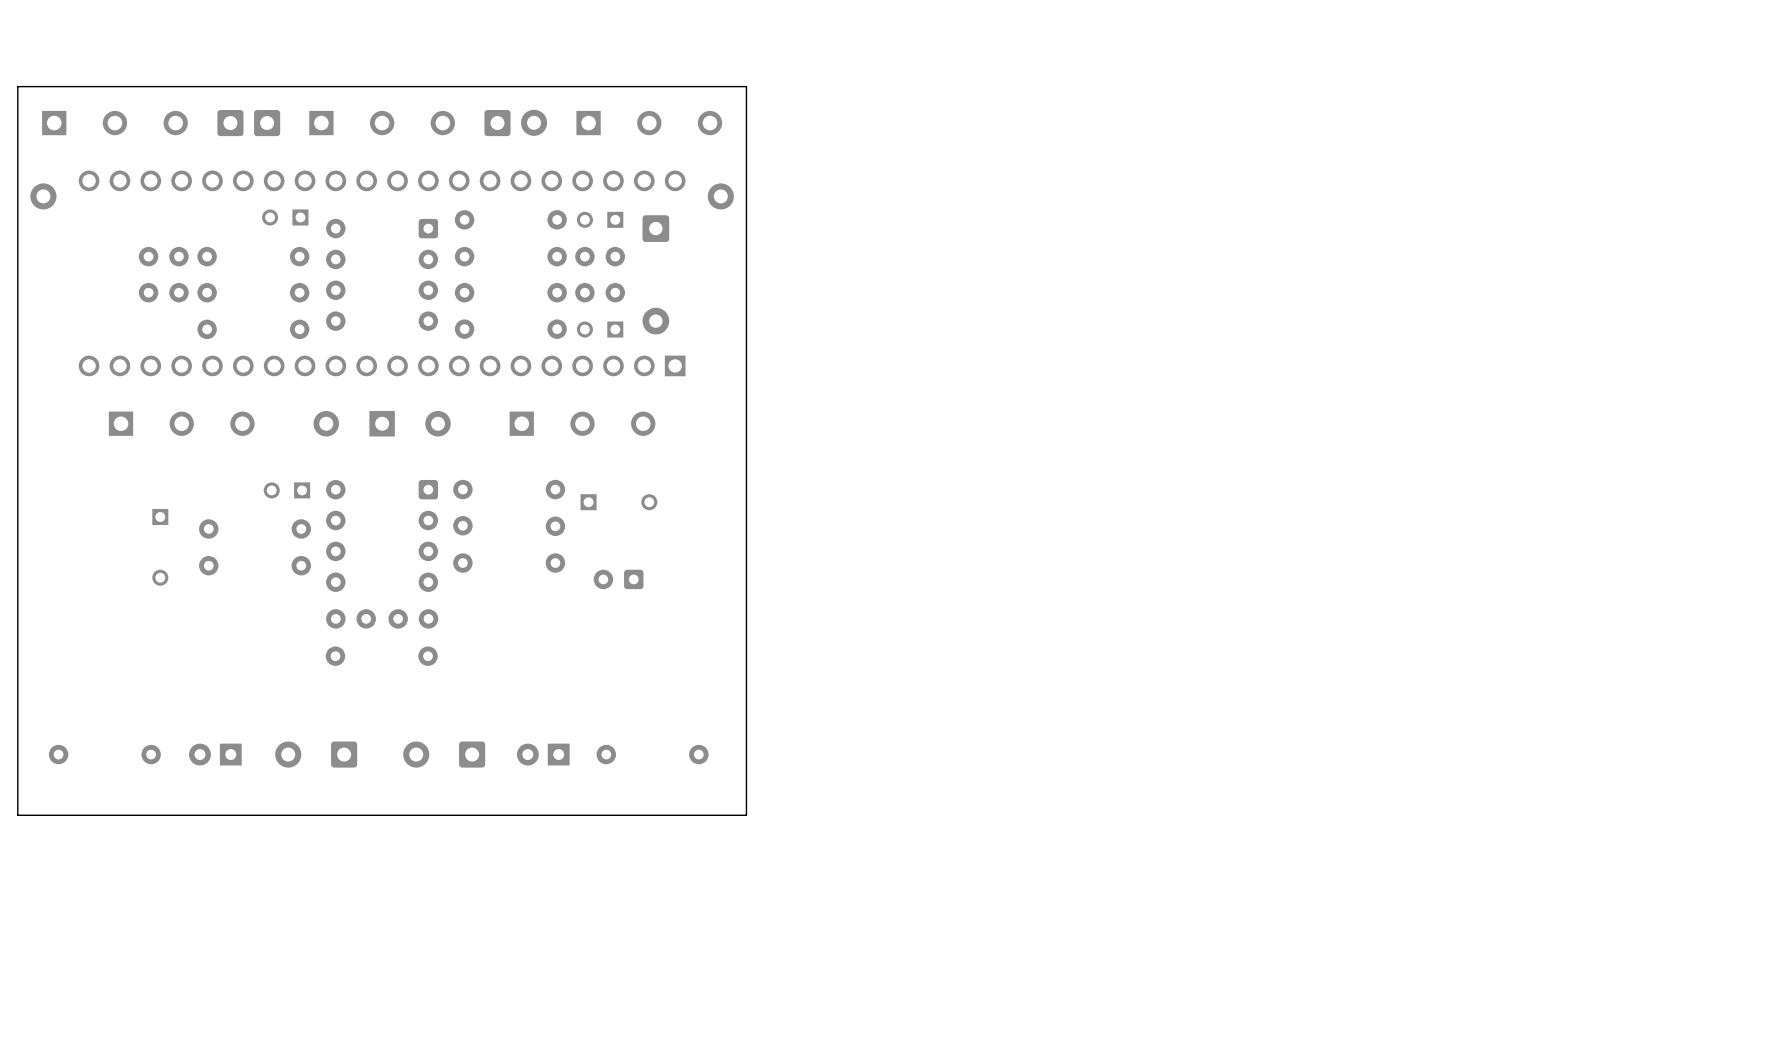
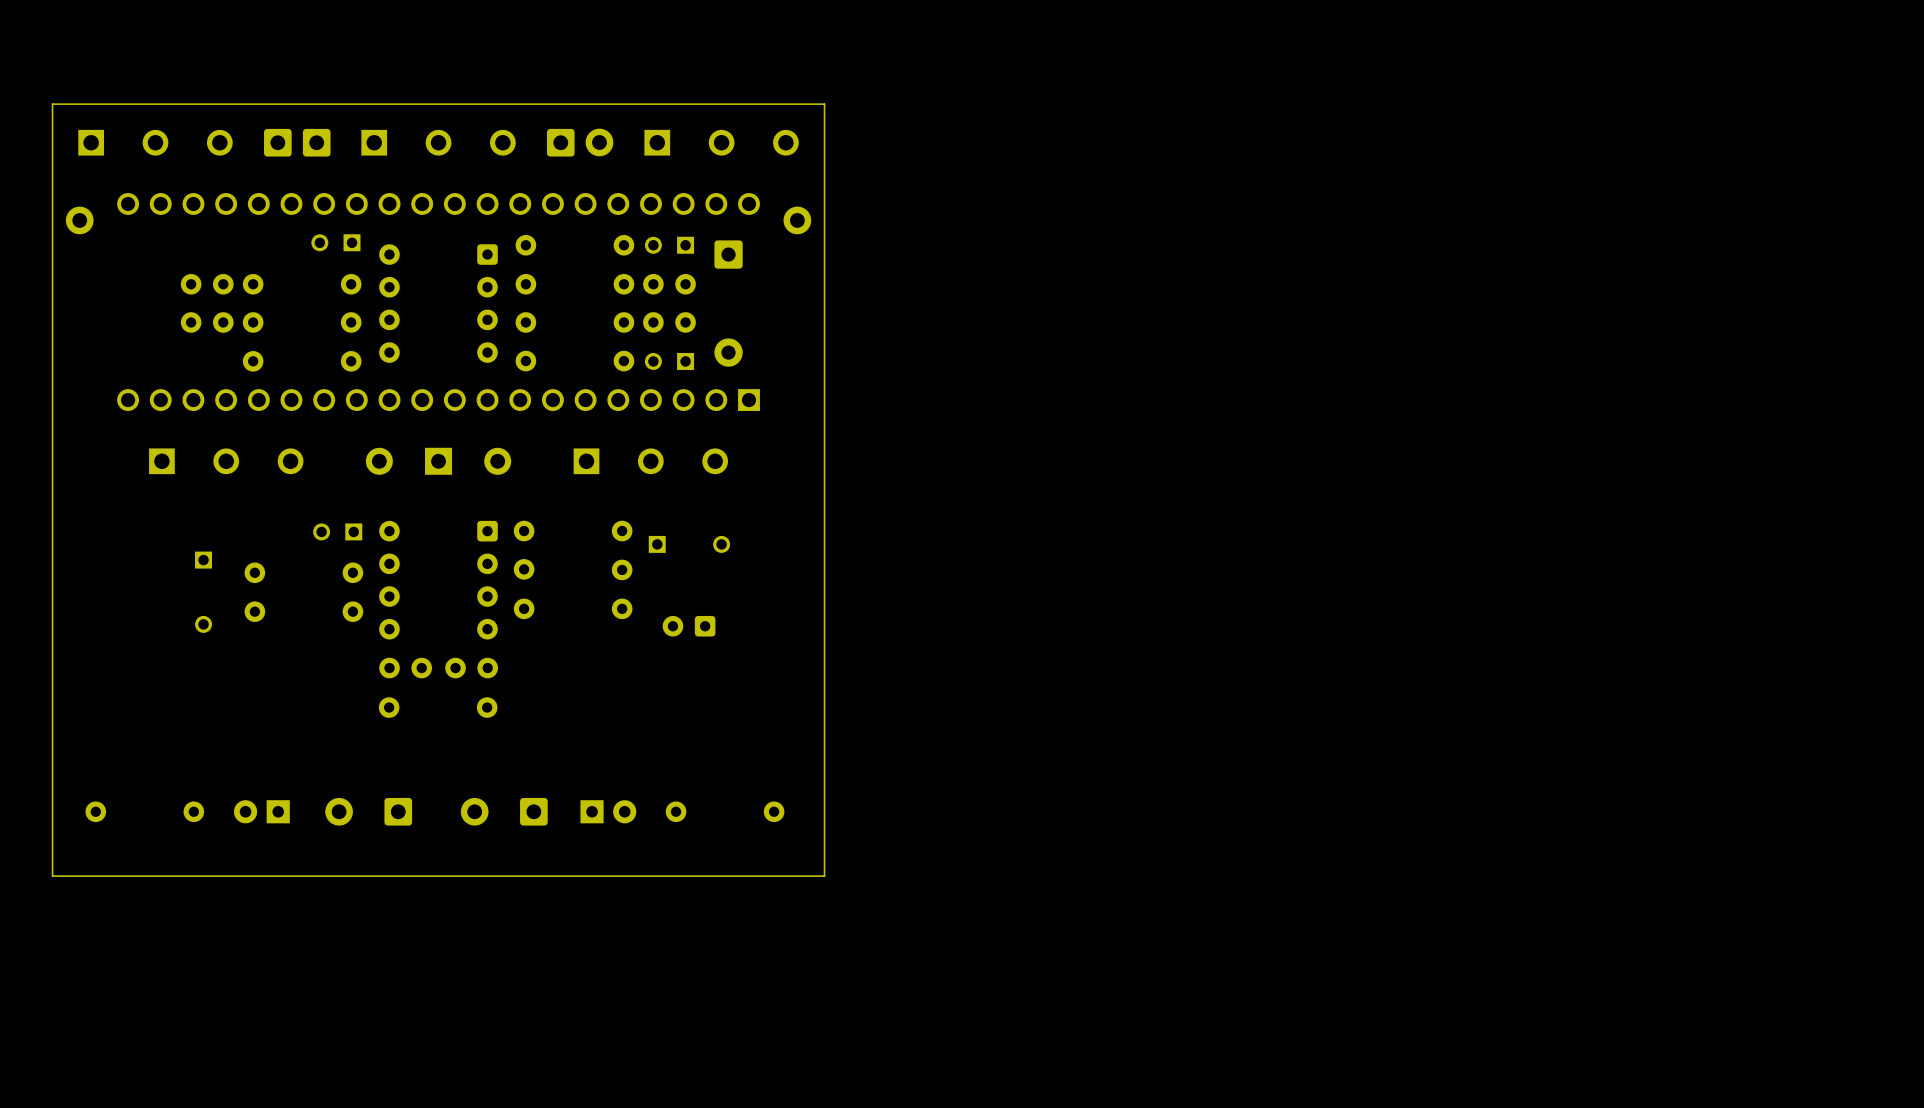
part rotation: 0° (543, 754) -> 180° (608, 811)

